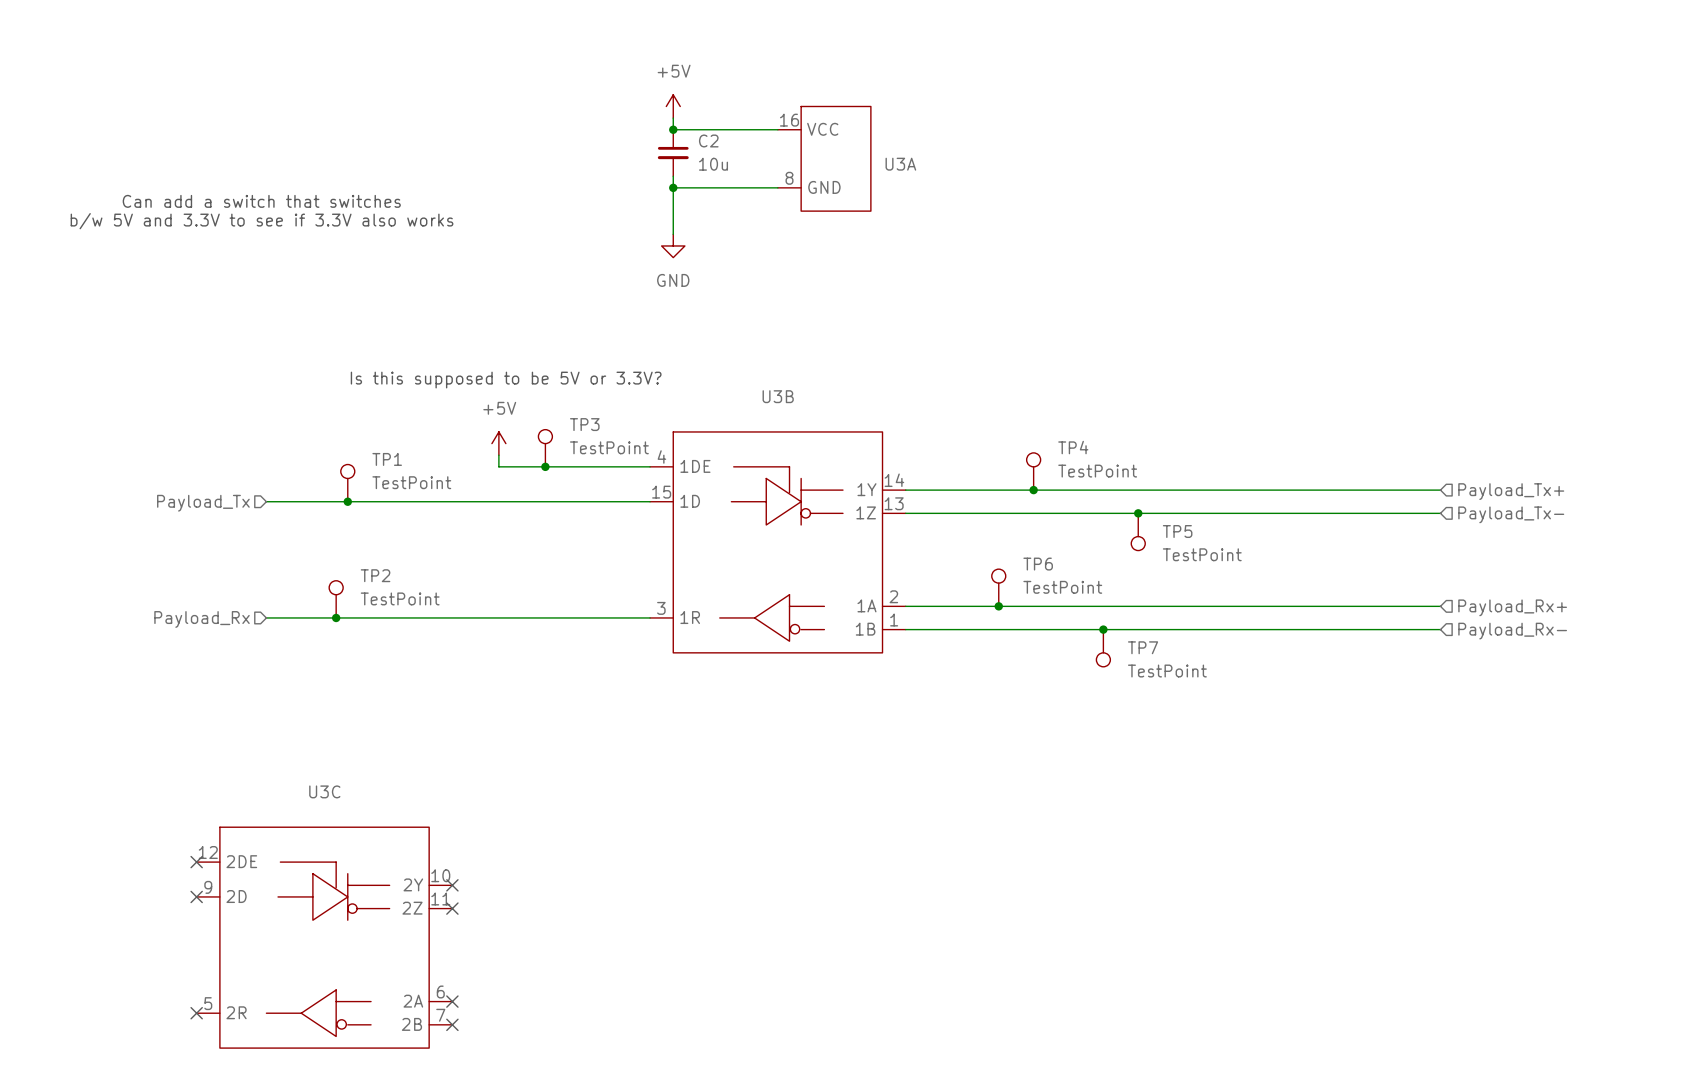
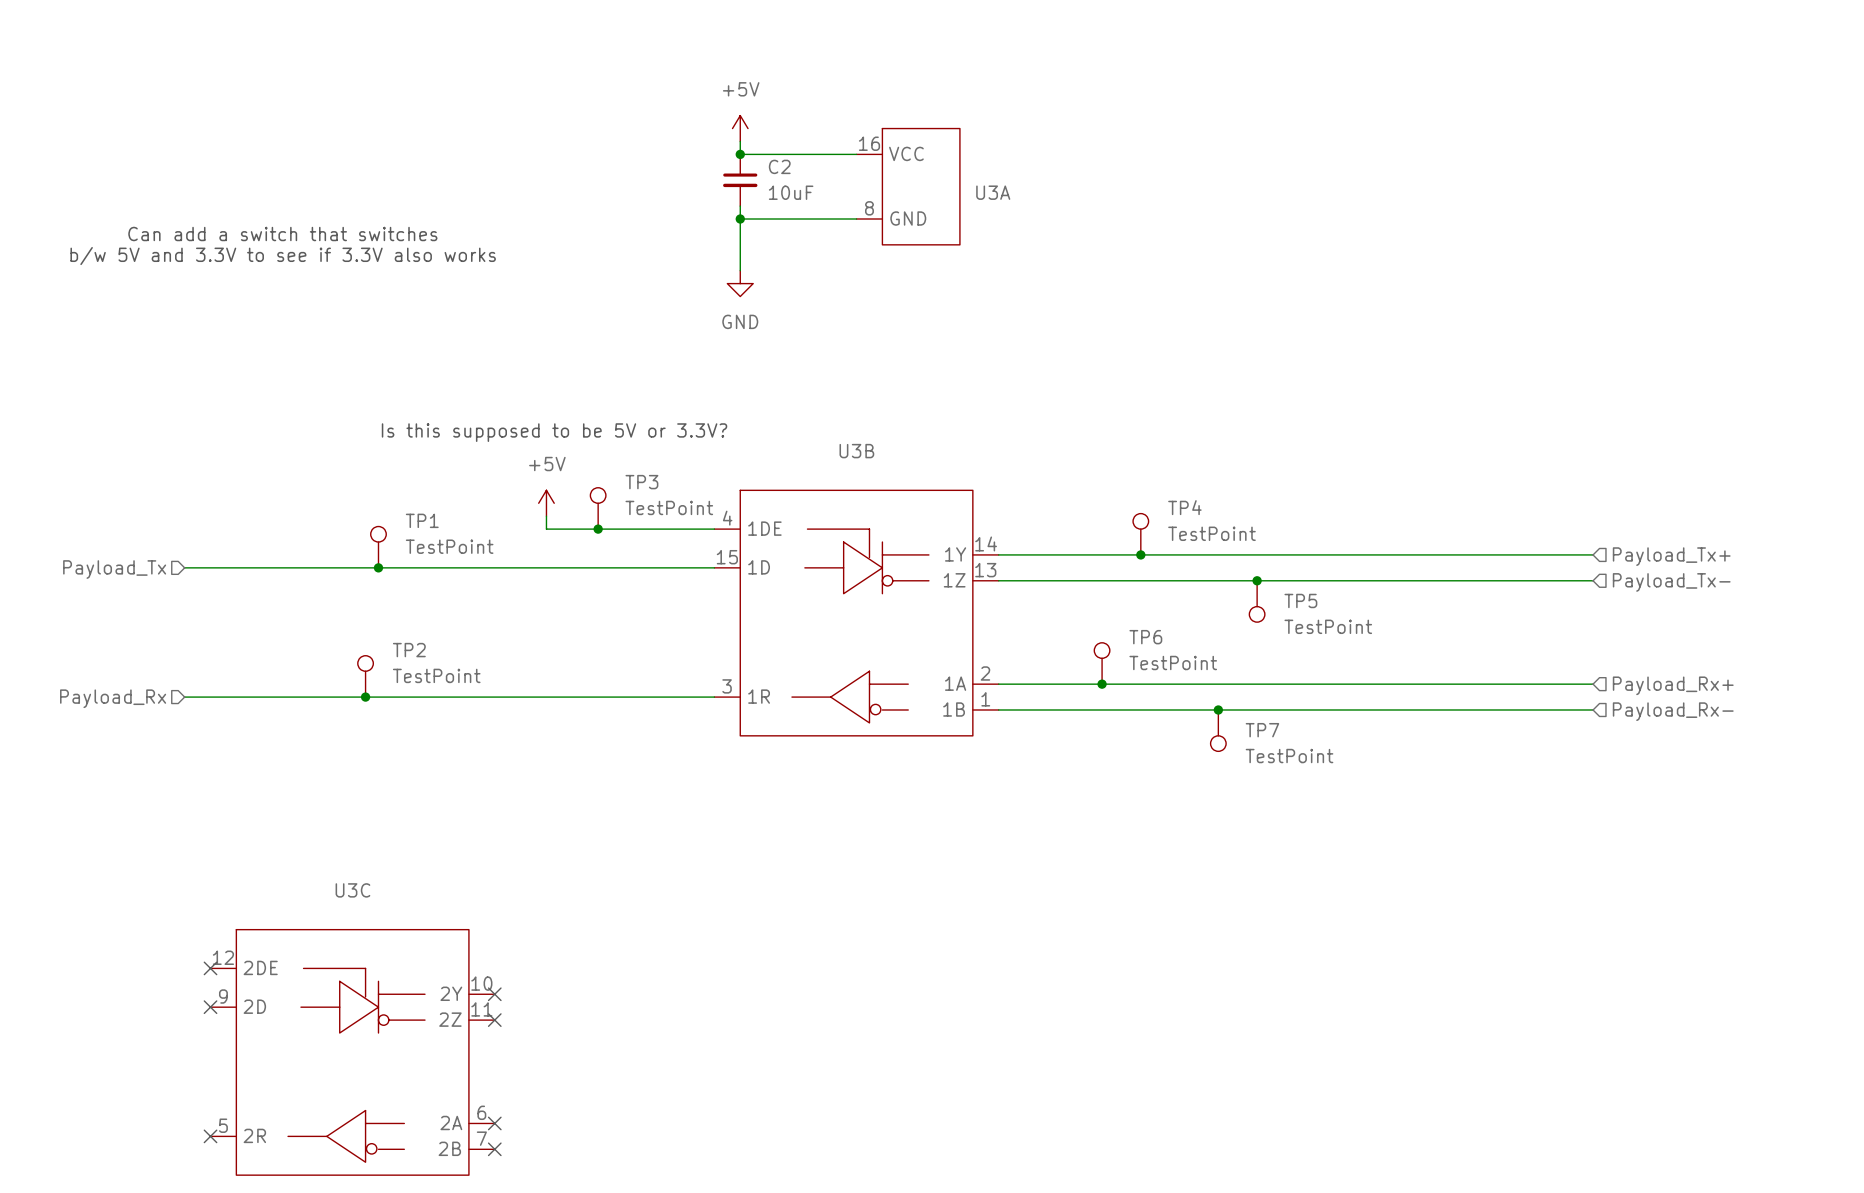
C2 value: 10u (713, 164) -> 10uF (791, 192)
wire: none -> (184, 567) (288, 567)
hierarchical label position: Payload_Tx (203, 503) -> Payload_Tx (114, 569)
wire: none -> (184, 697) (288, 697)
hierarchical label position: Payload_Rx (202, 619) -> Payload_Rx (113, 698)

